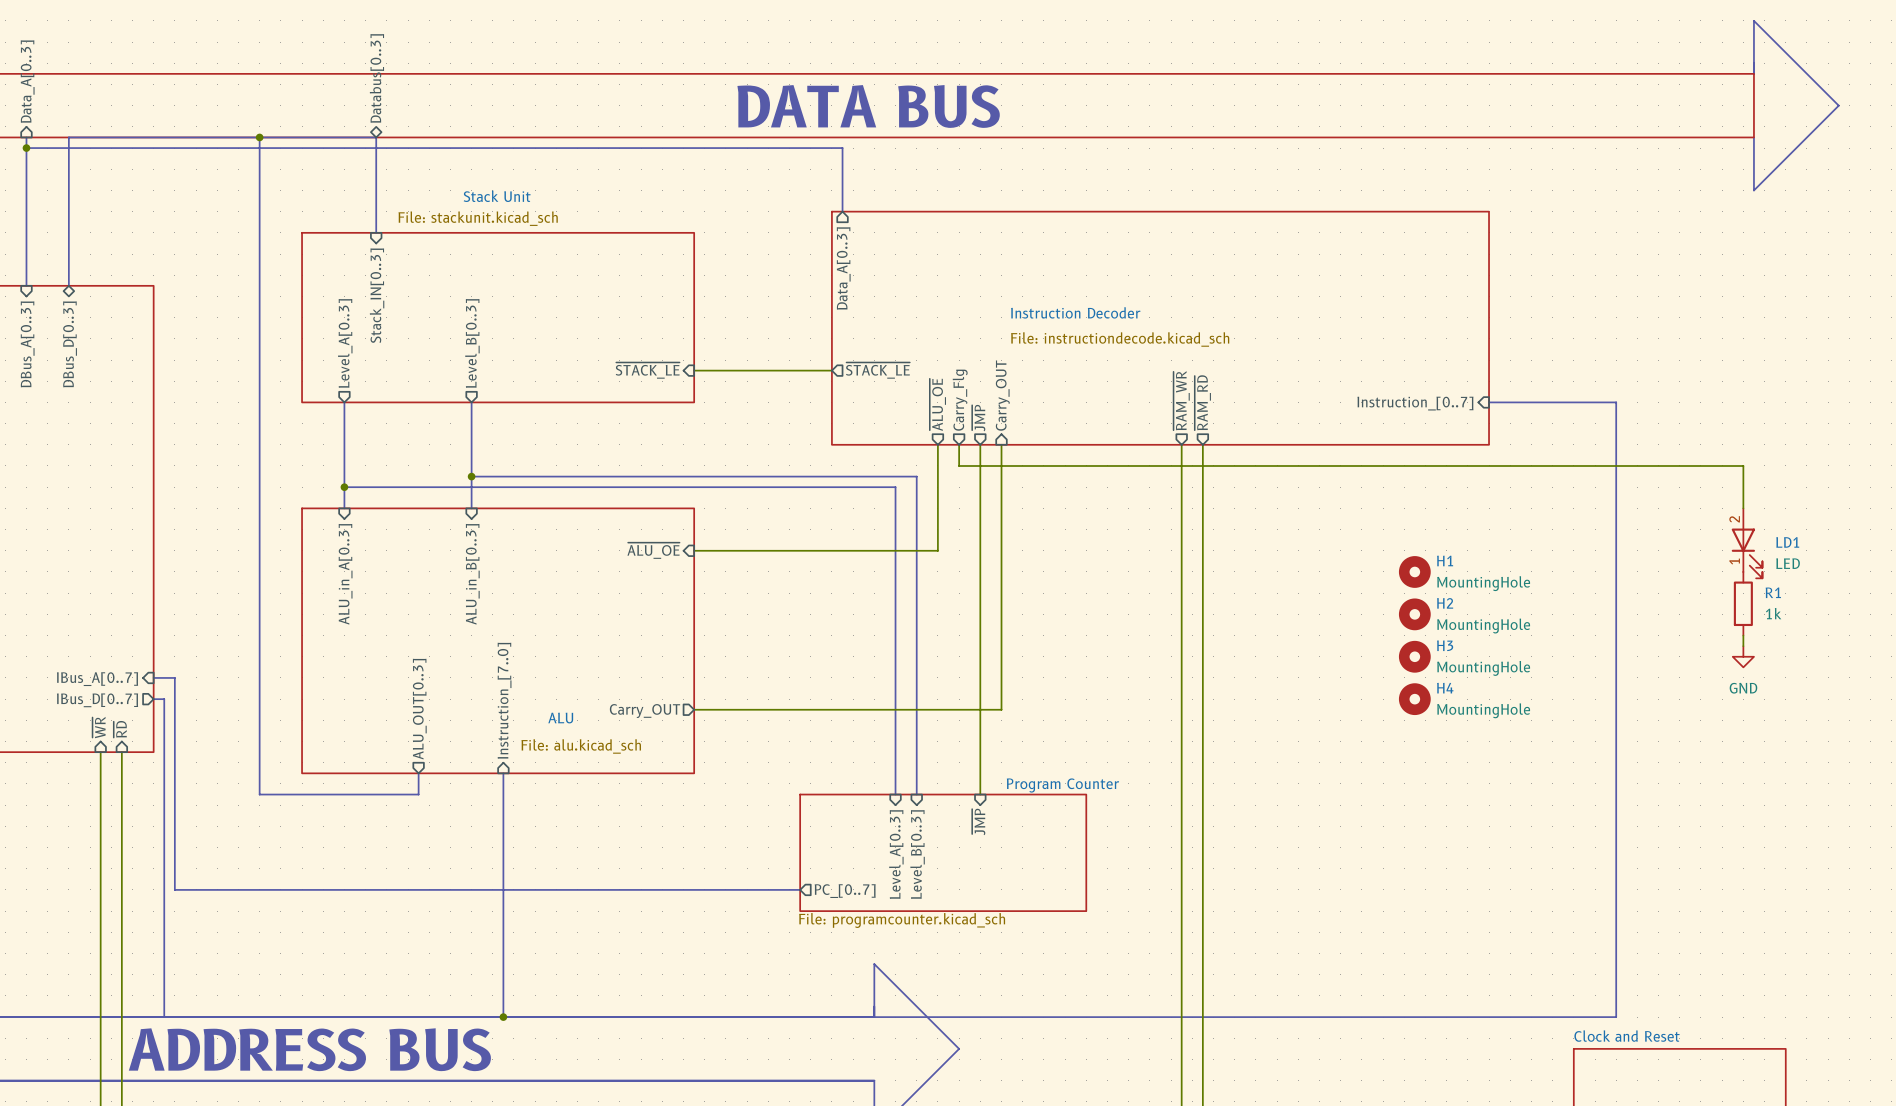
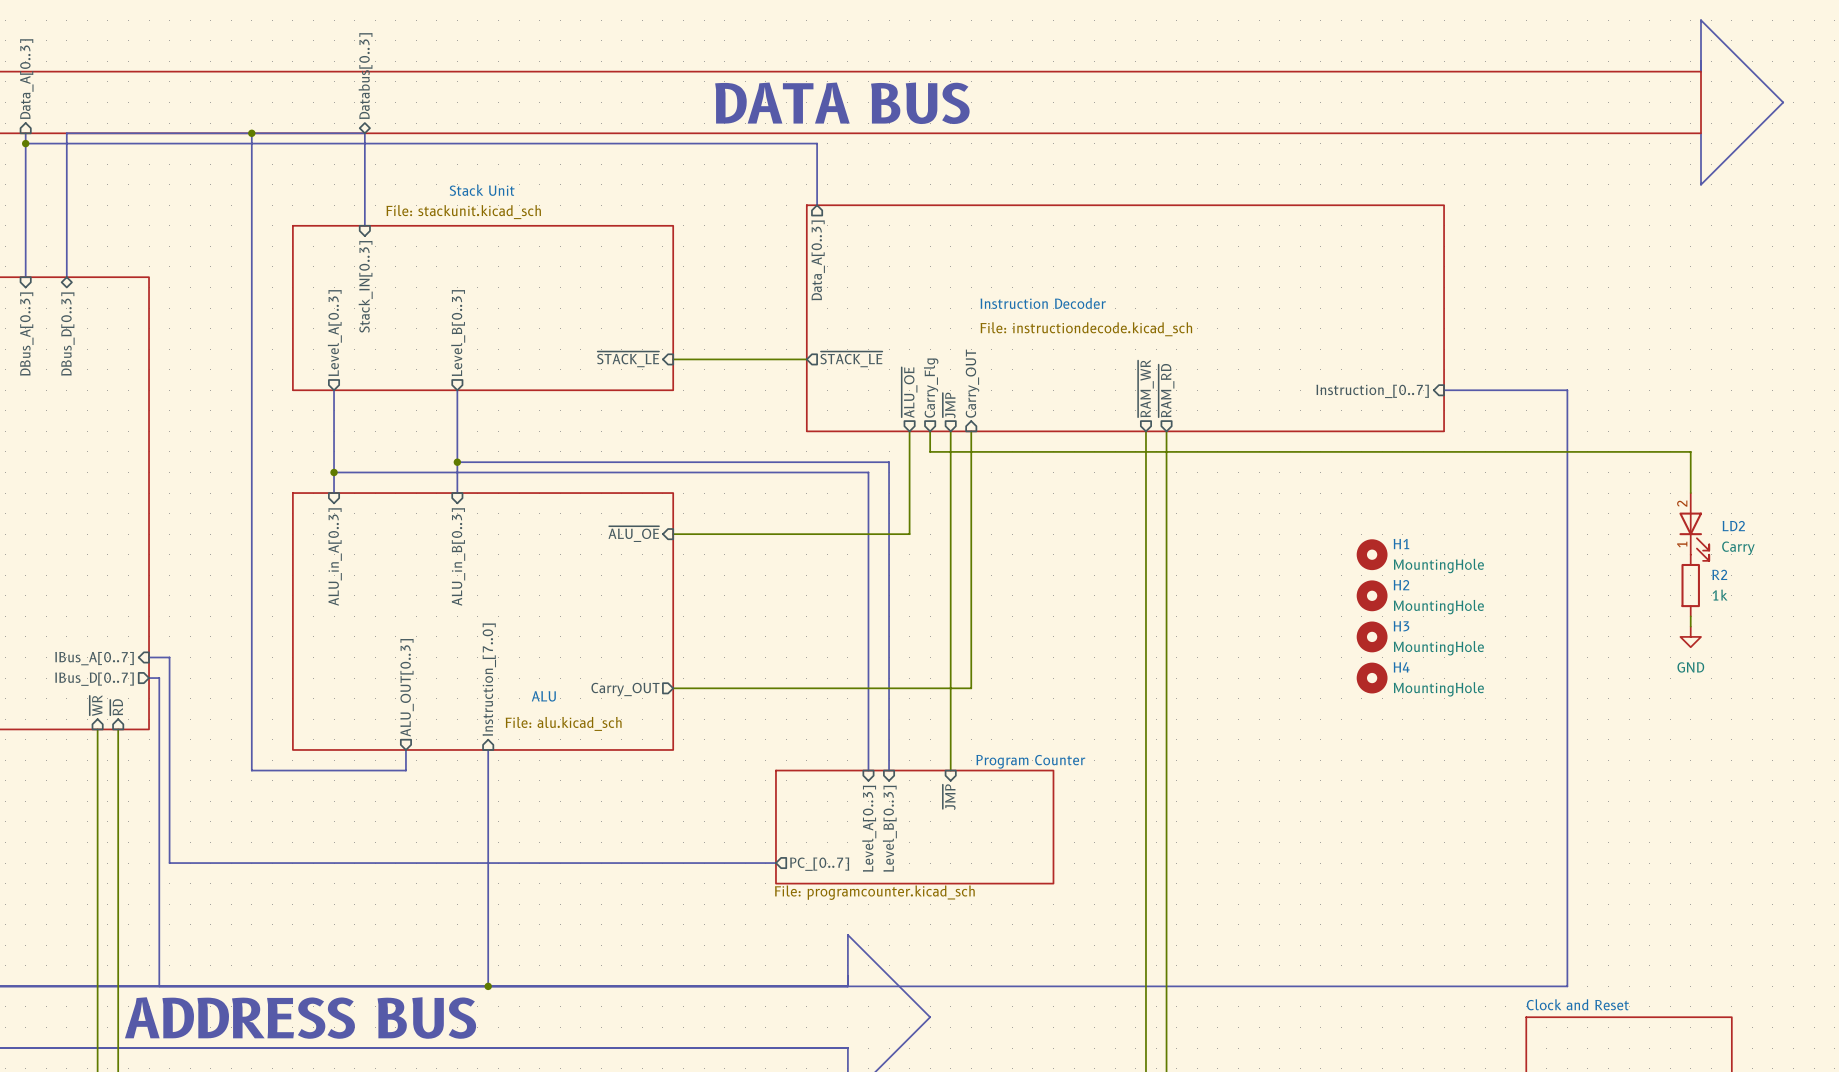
LD1 name: LD1 (1787, 542) -> LD2 (1733, 526)
LD1 value: LED (1788, 563) -> Carry (1738, 548)
R1 name: R1 (1773, 592) -> R2 (1719, 574)

